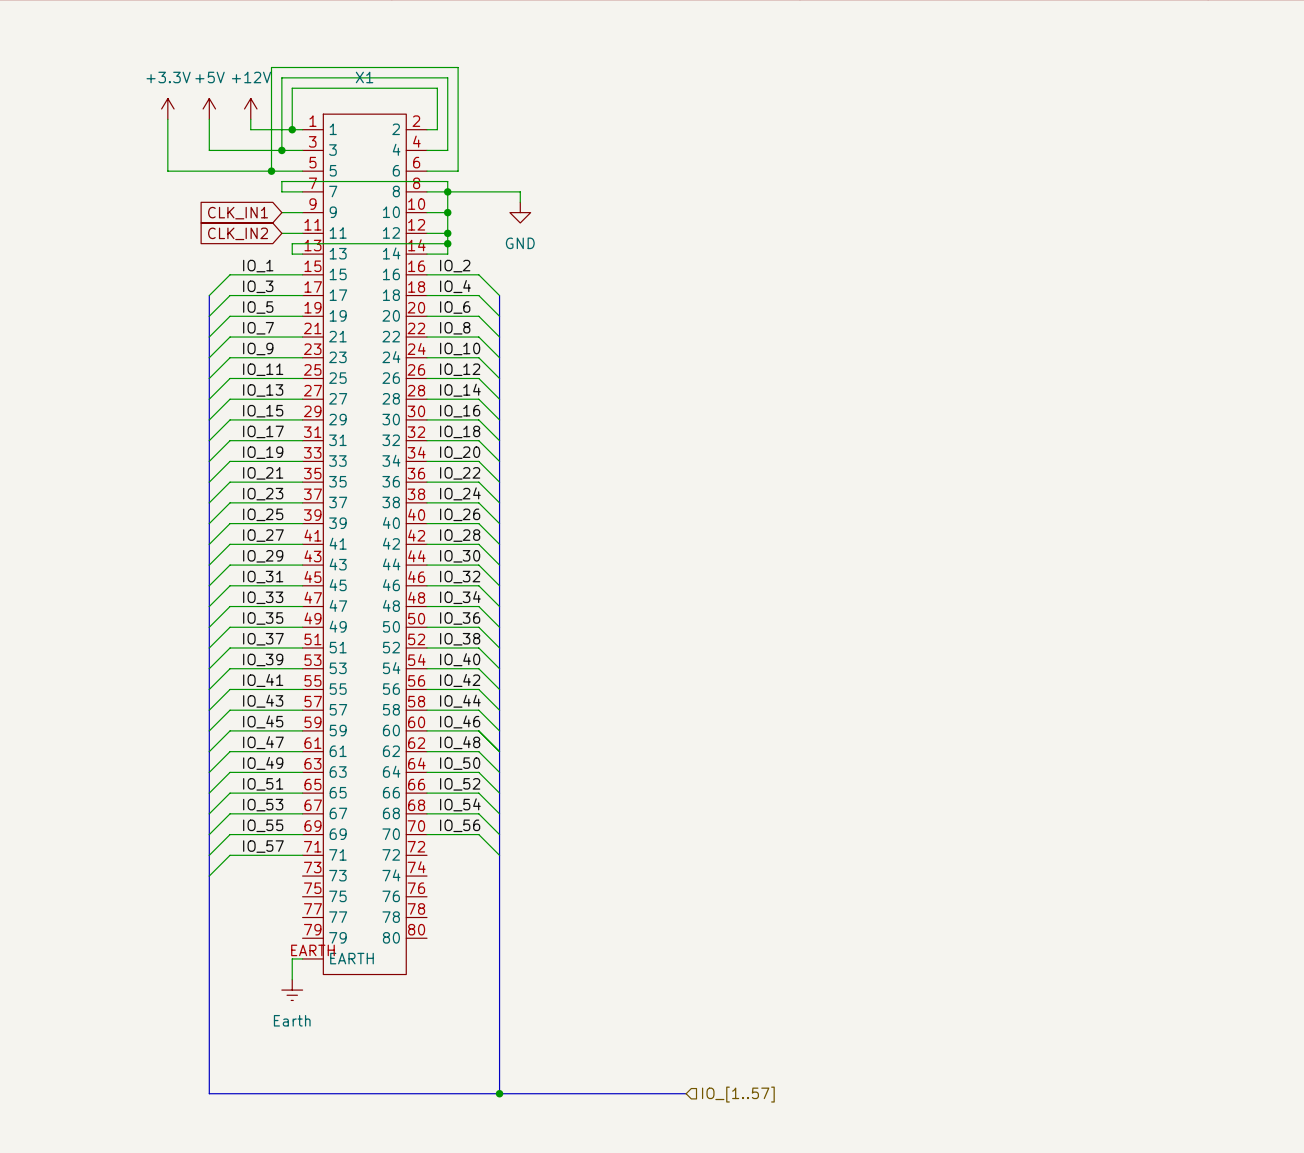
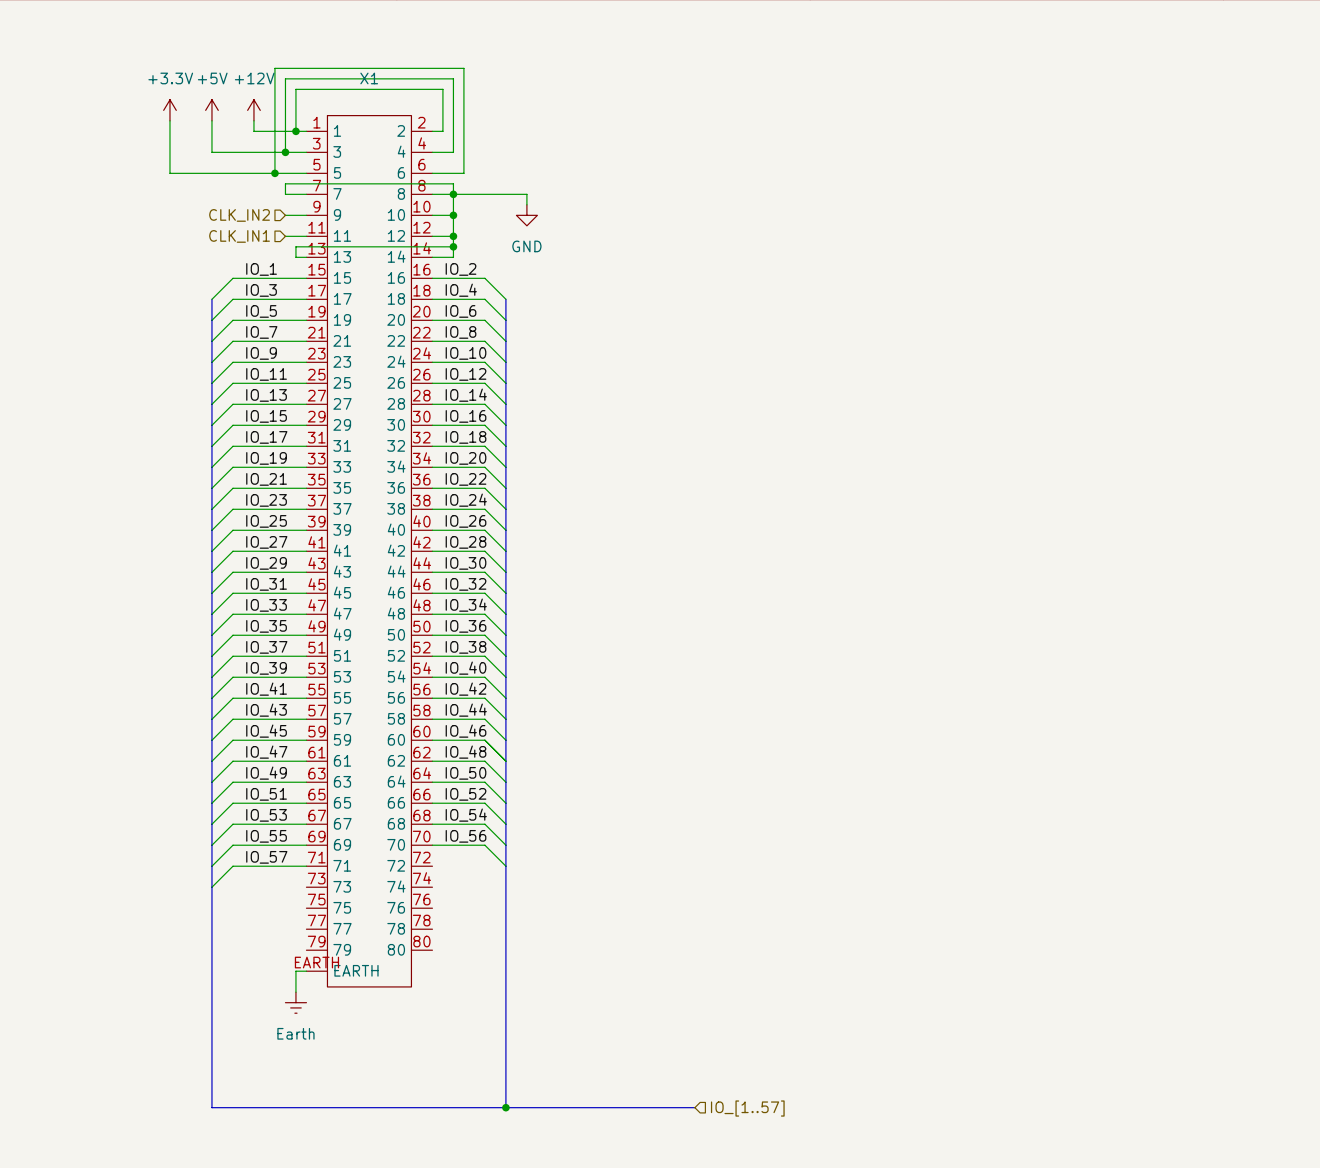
hierarchical label: none -> CLK_IN2 (239, 215)
global label: CLK_IN1 (238, 213) -> none
hierarchical label: none -> CLK_IN1 (239, 236)
global label: CLK_IN2 (238, 233) -> none

